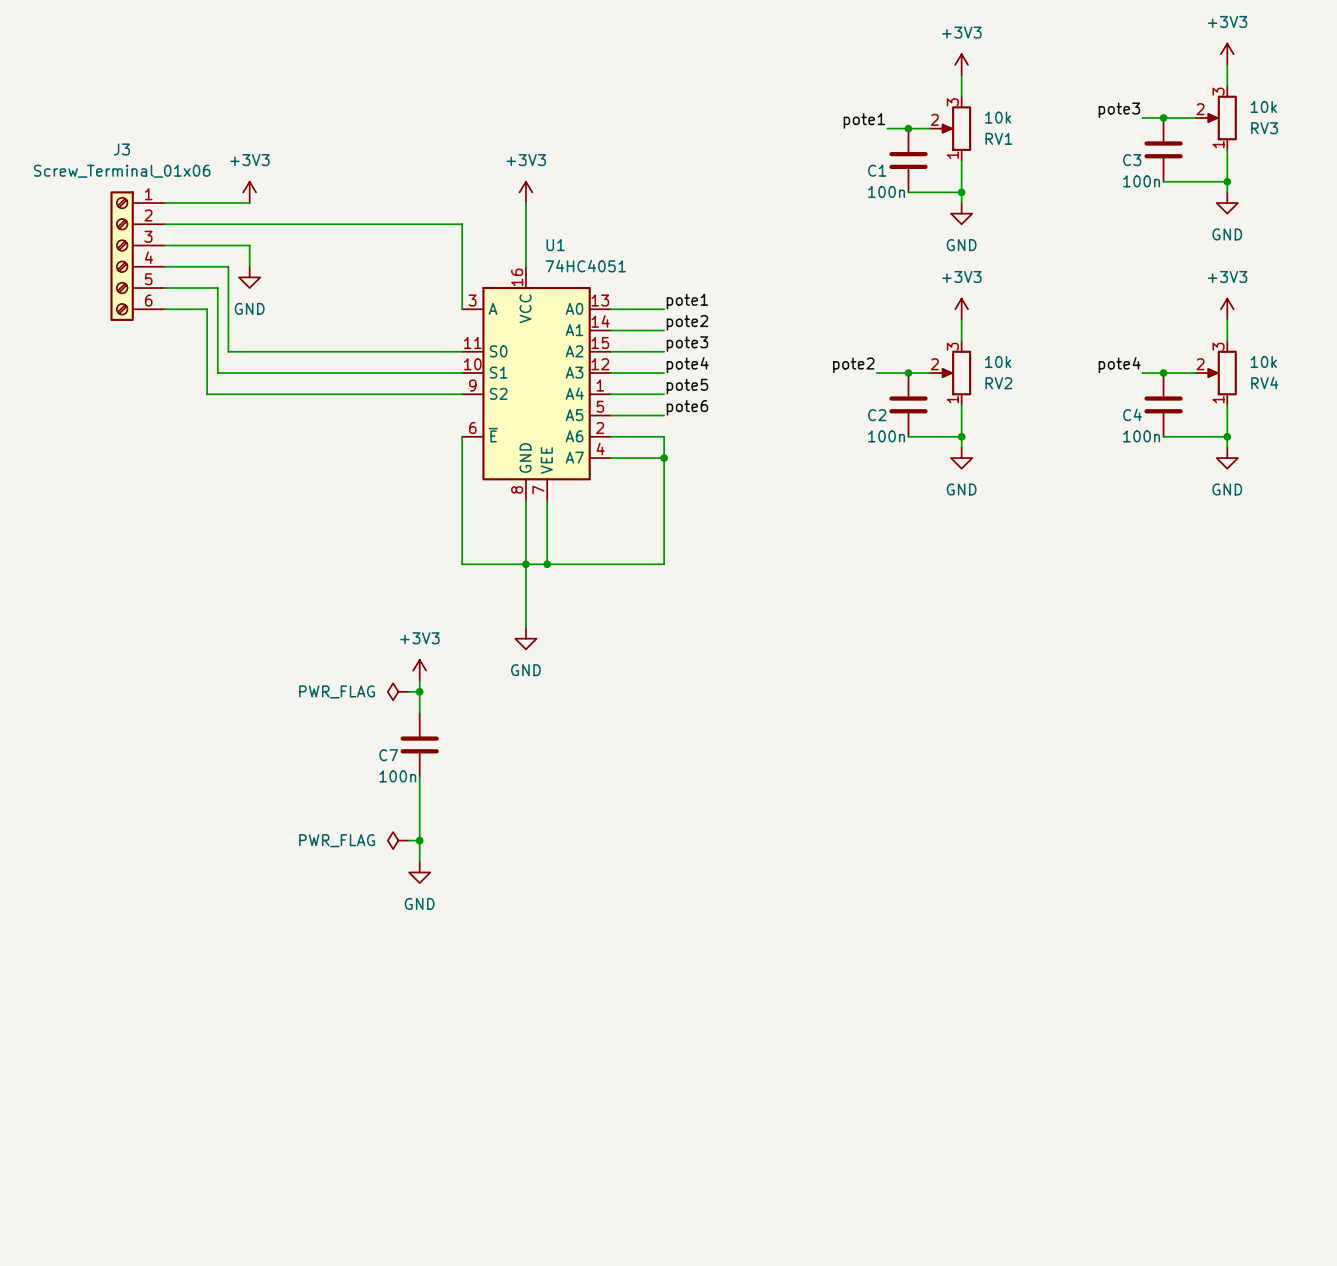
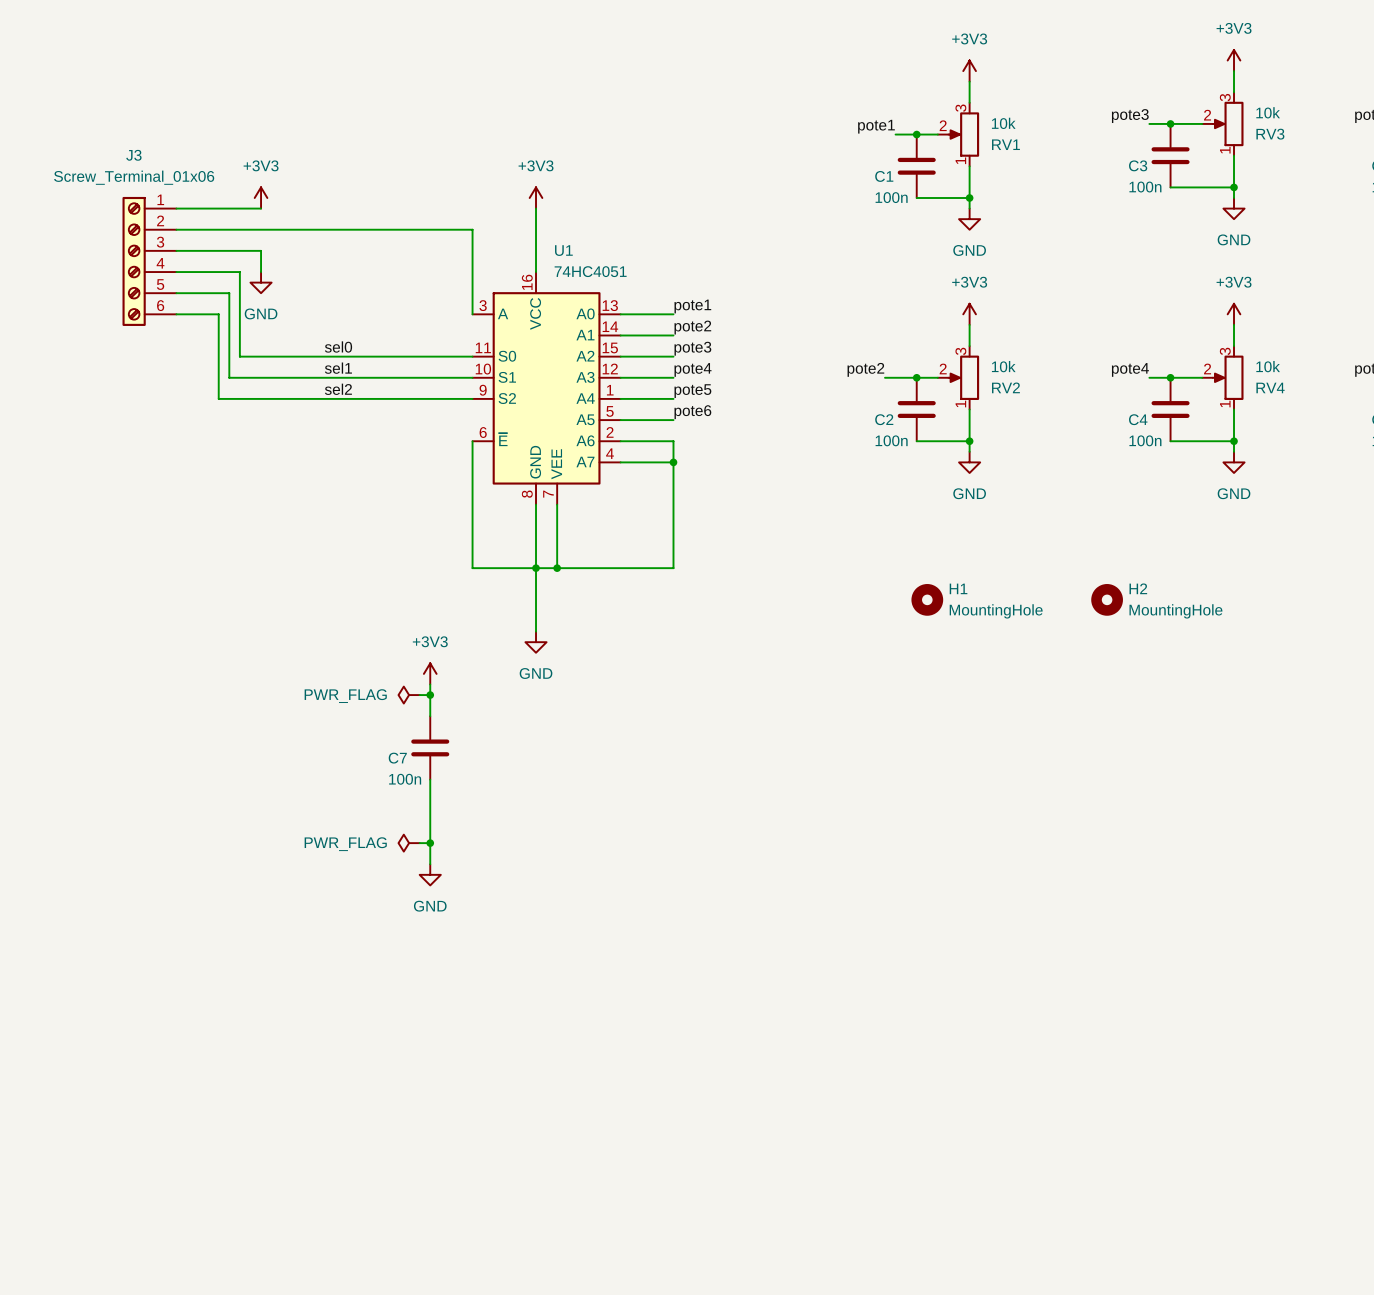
label: none -> sel0 (338, 346)
label: none -> sel1 (338, 368)
label: none -> sel2 (338, 389)
H1: none -> MountingHole (927, 599)
H2: none -> MountingHole (1107, 599)

